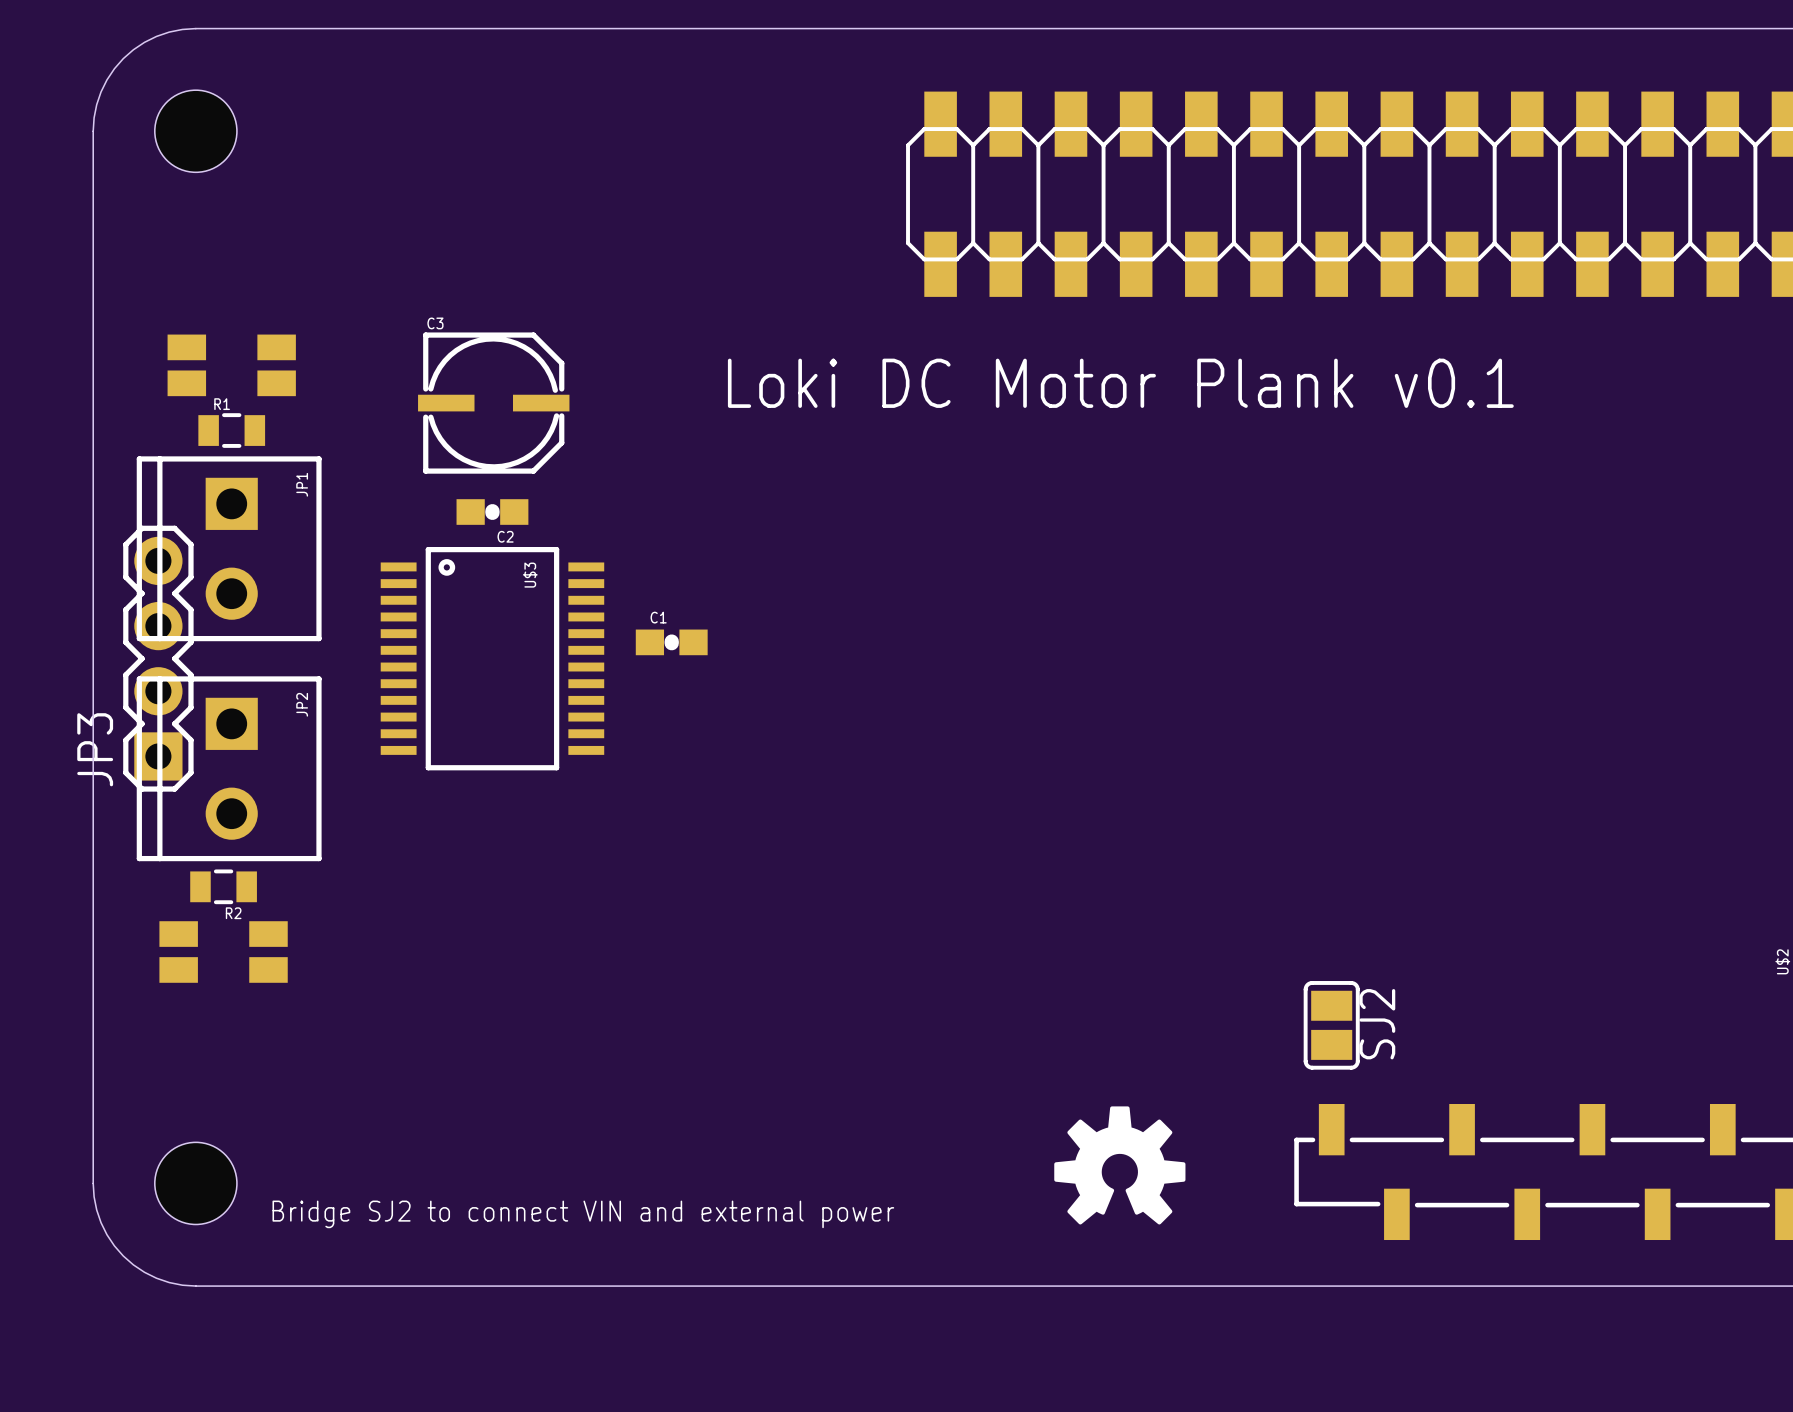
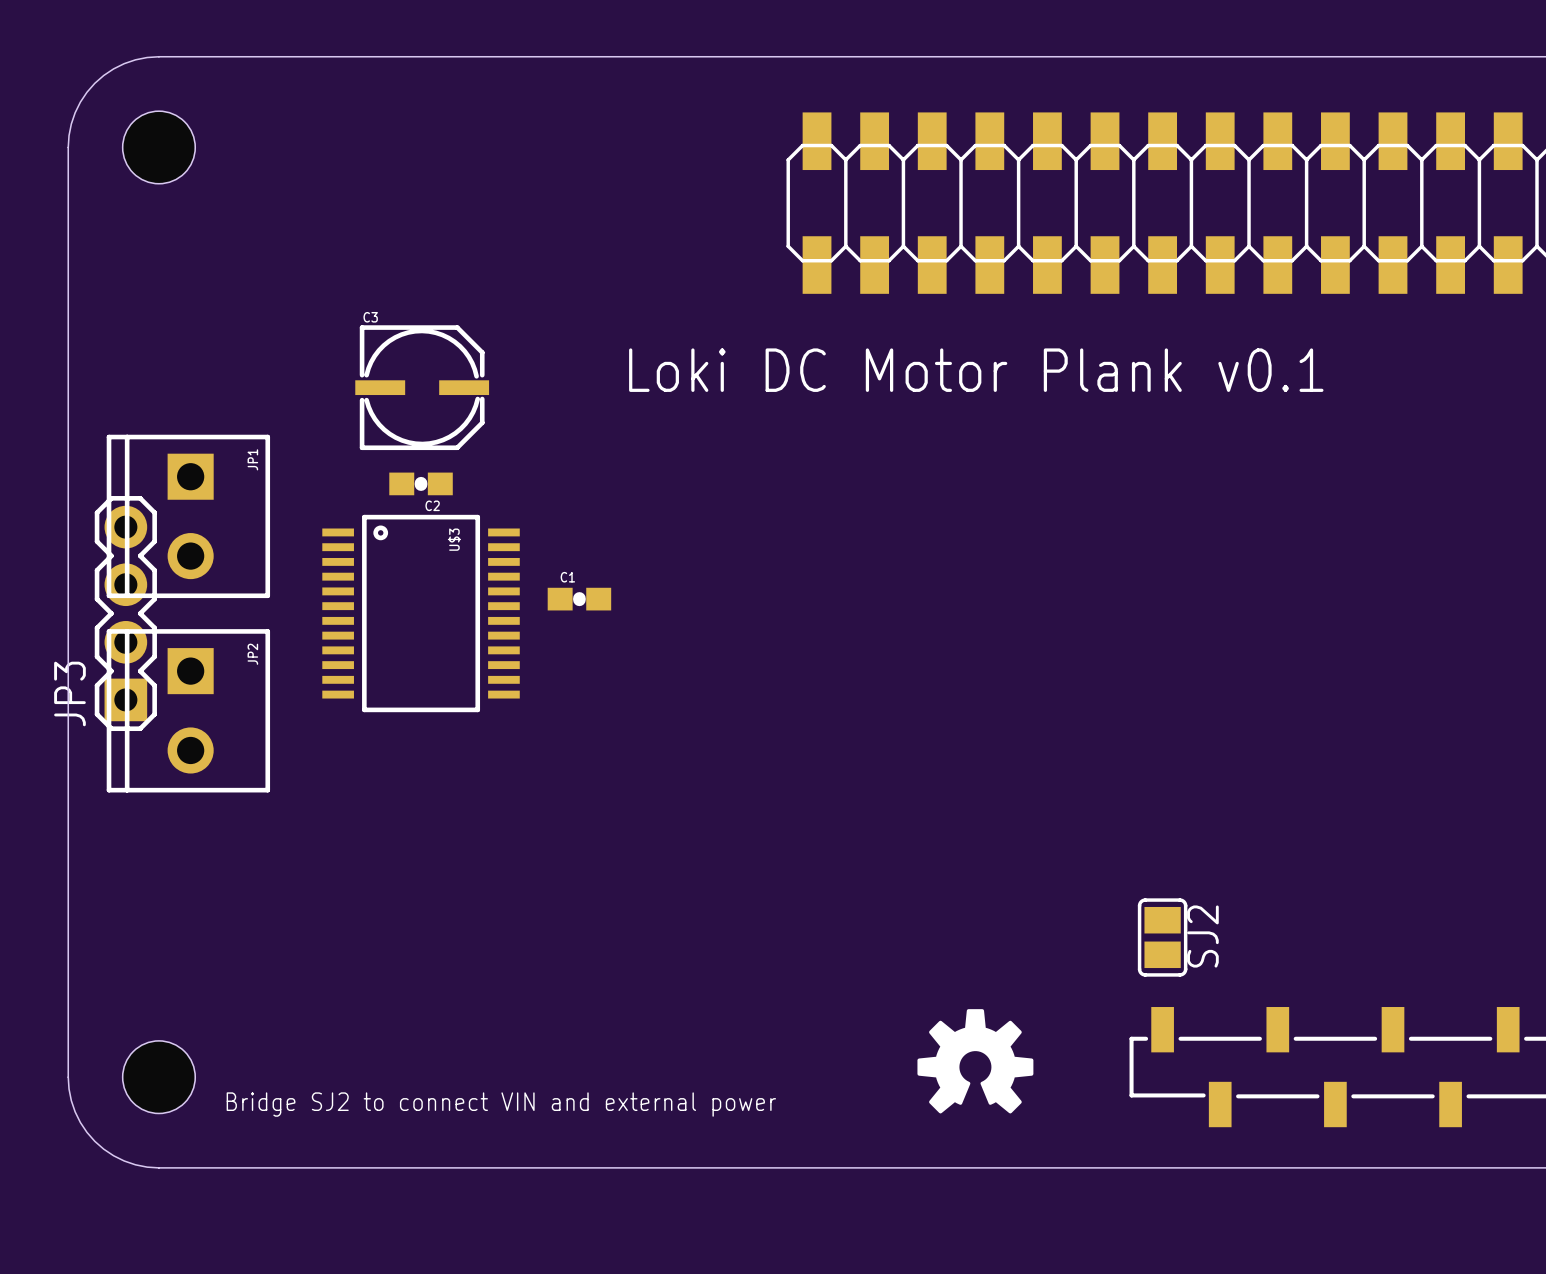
part: (231, 365) -> none
R1: (231, 430) -> none
R2: (223, 886) -> none
part: (223, 952) -> none

